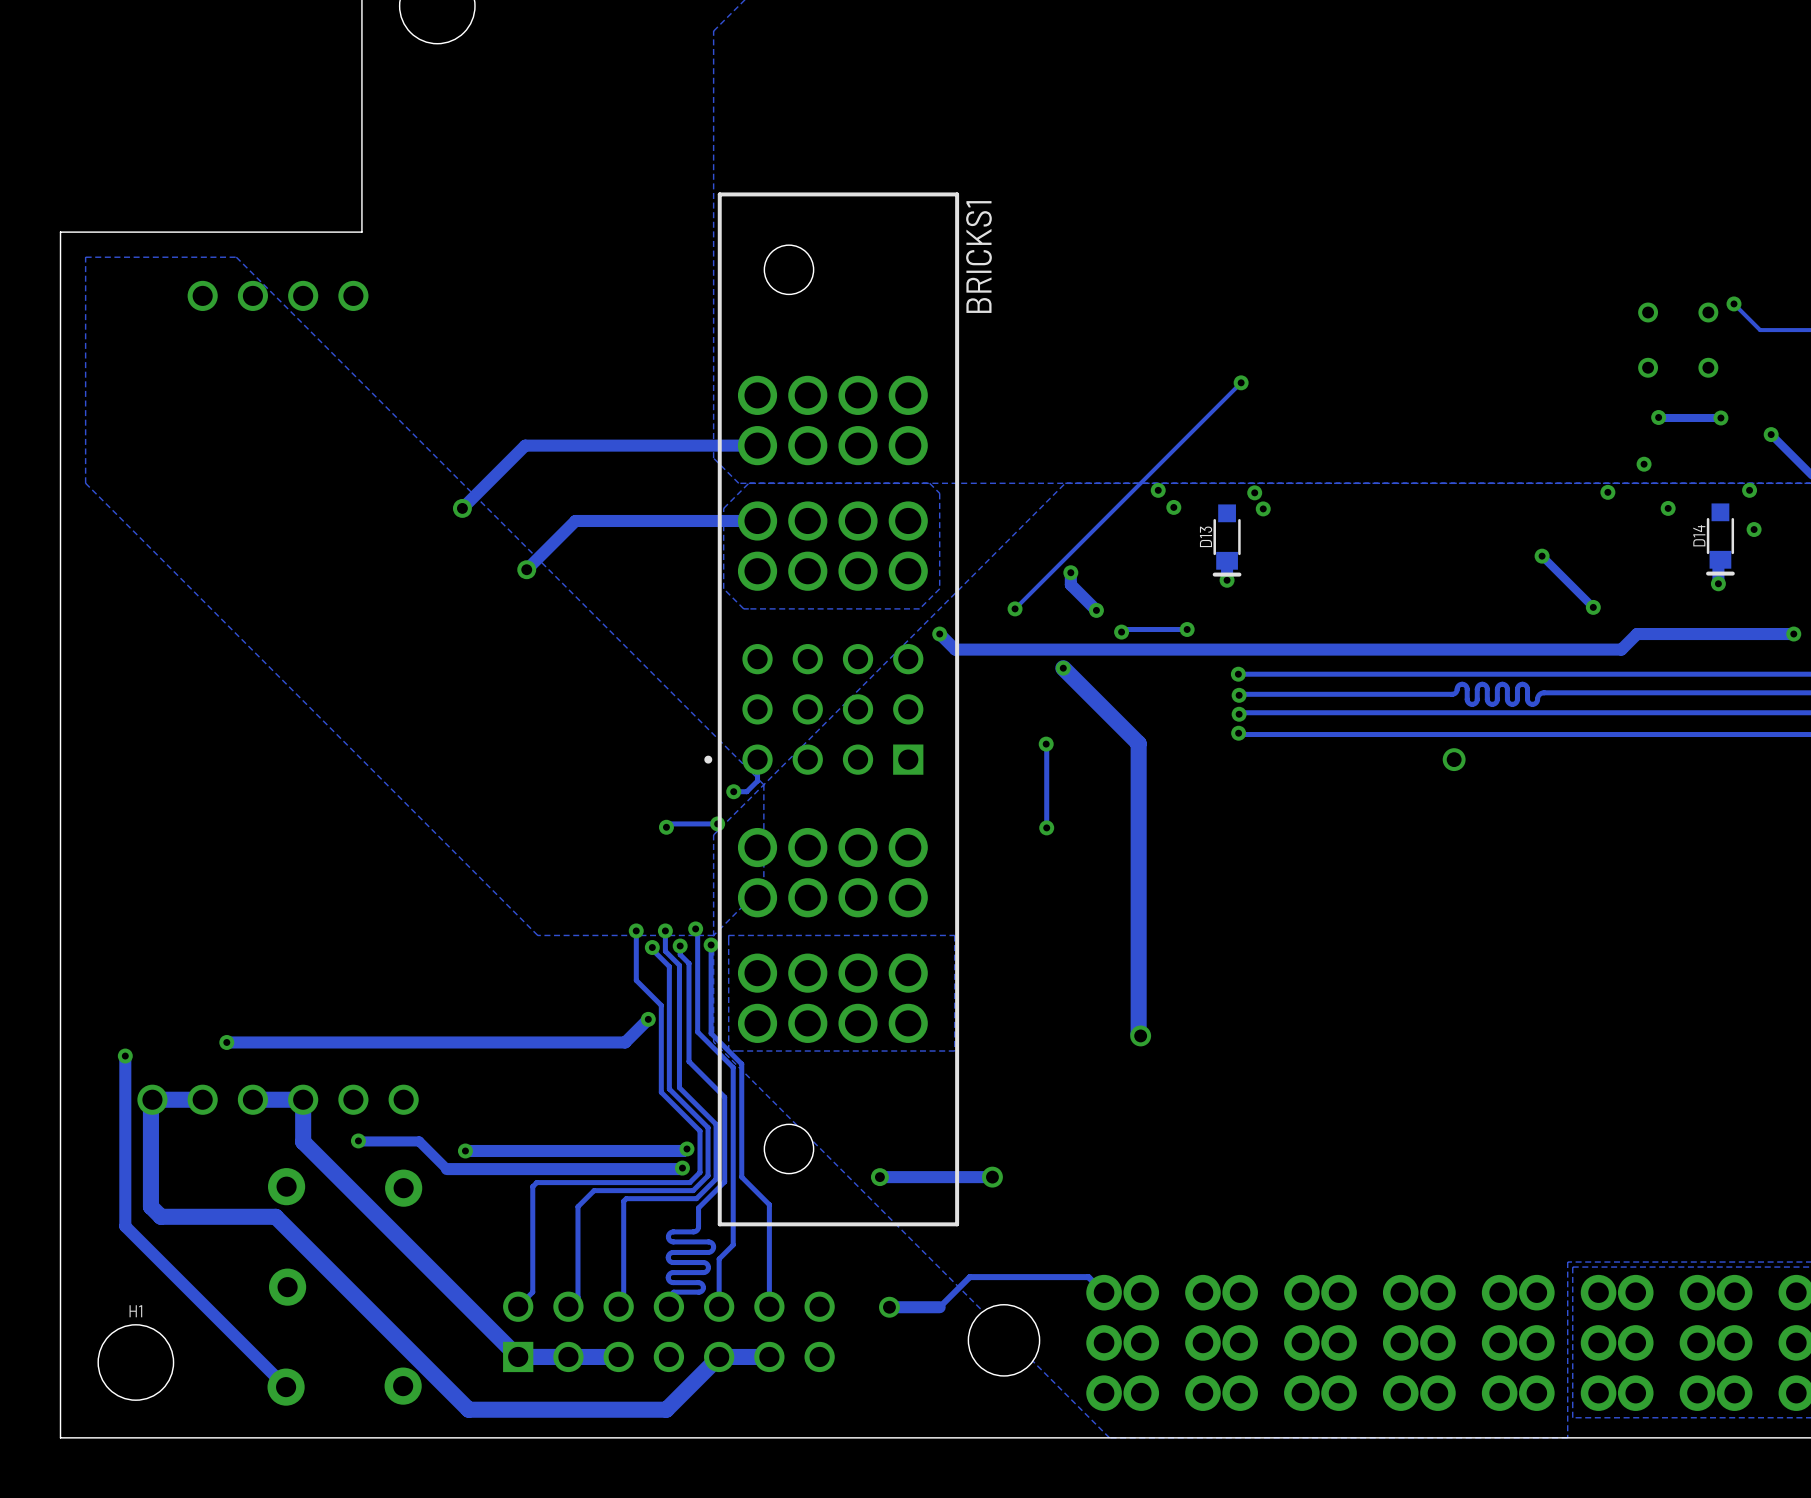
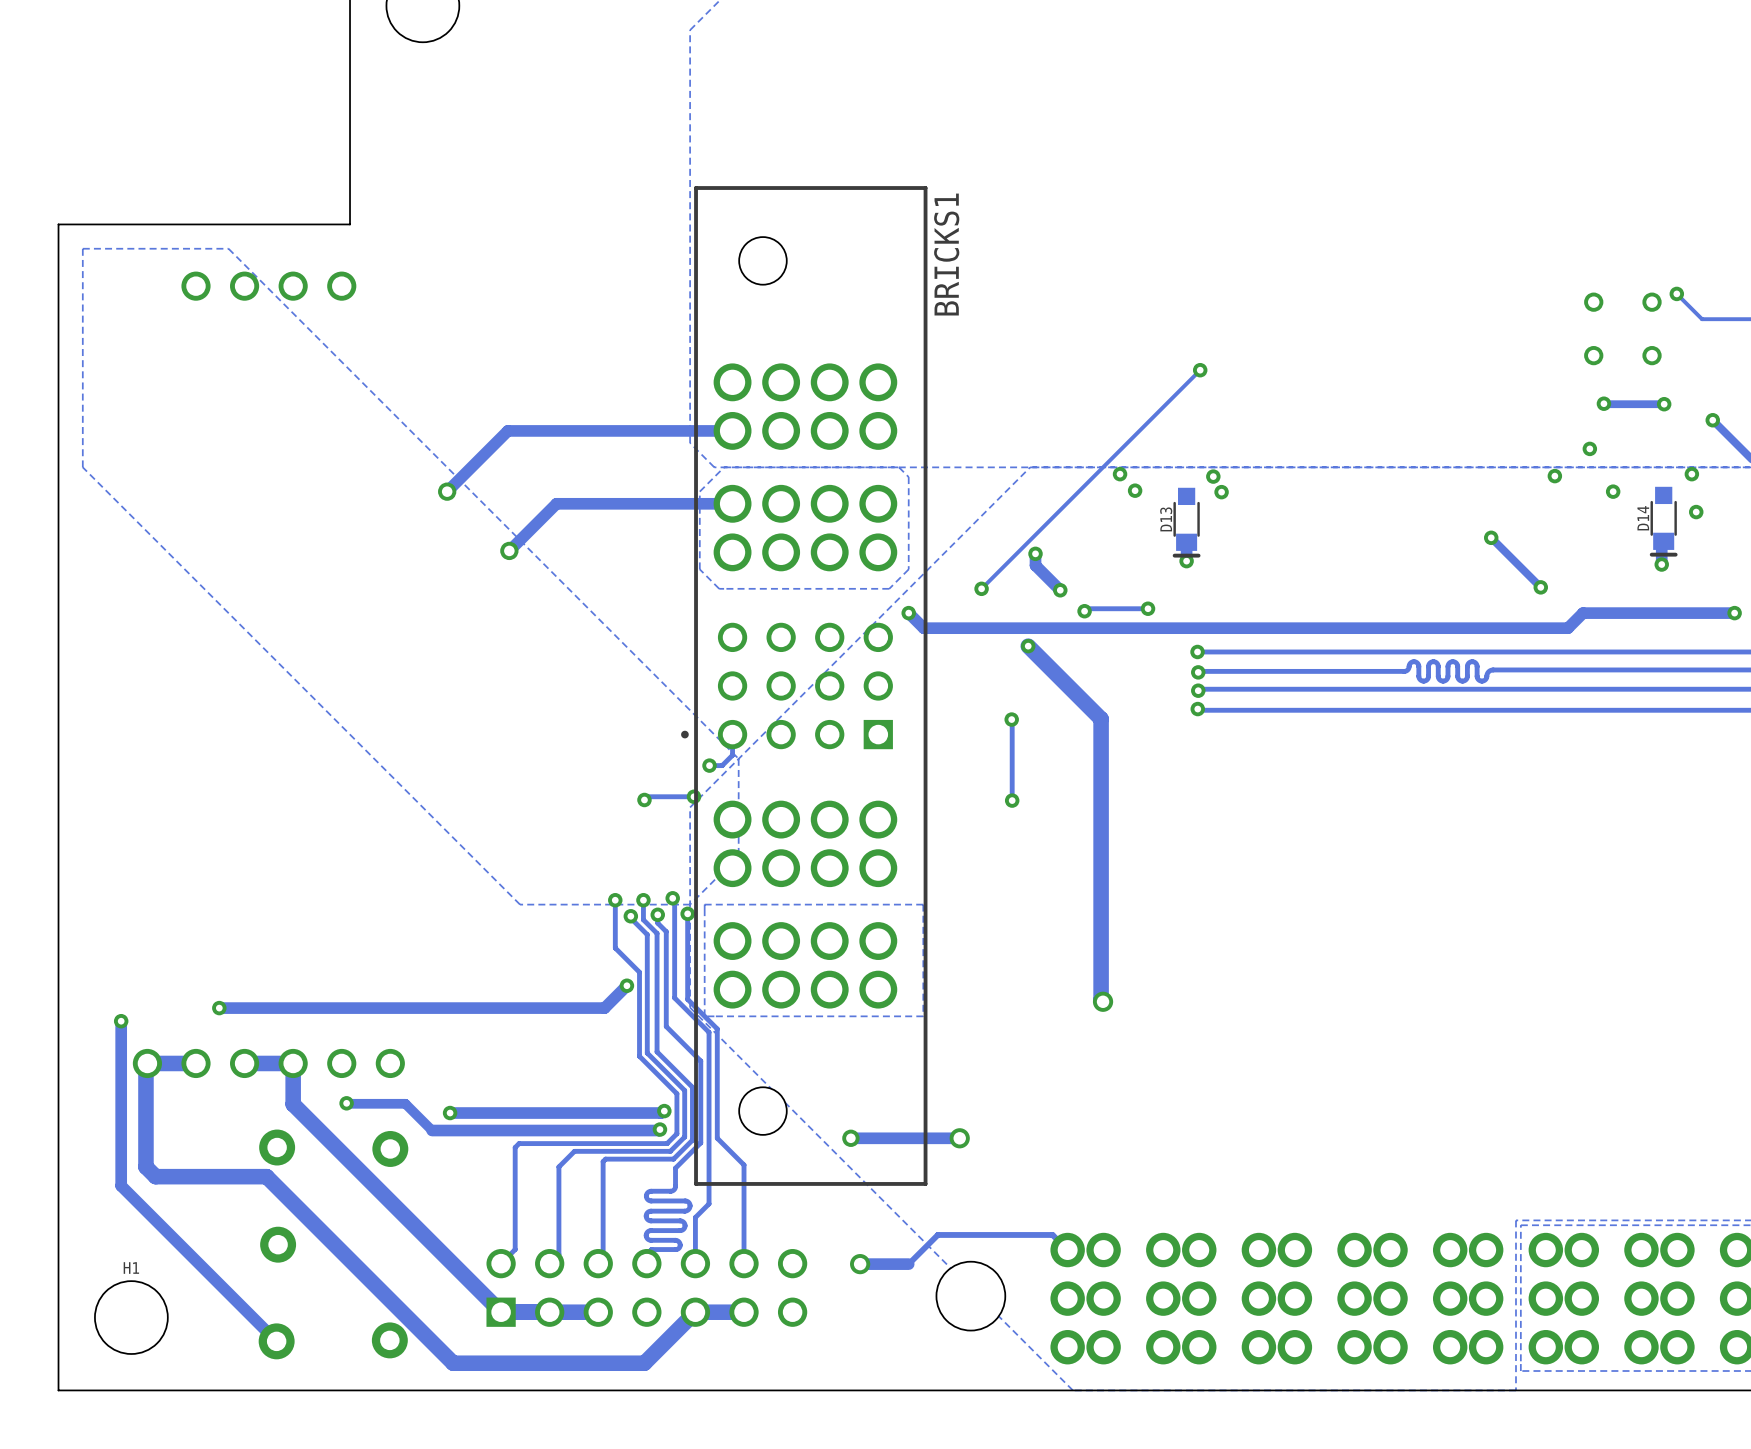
via: (1454, 759) -> none

